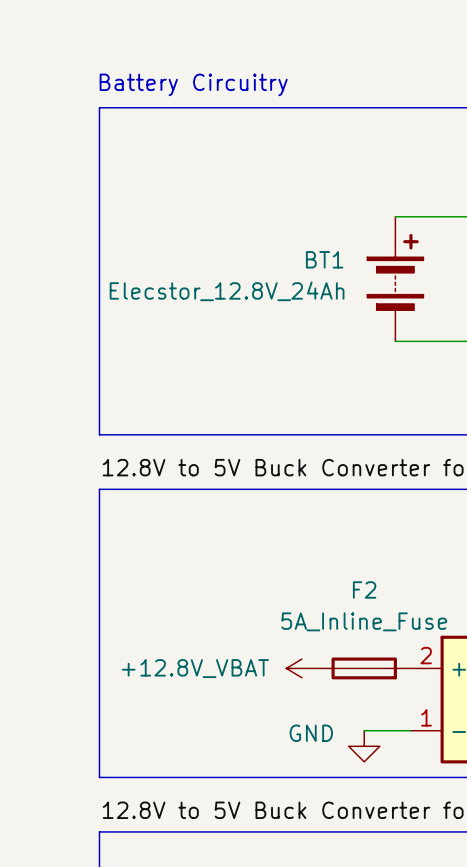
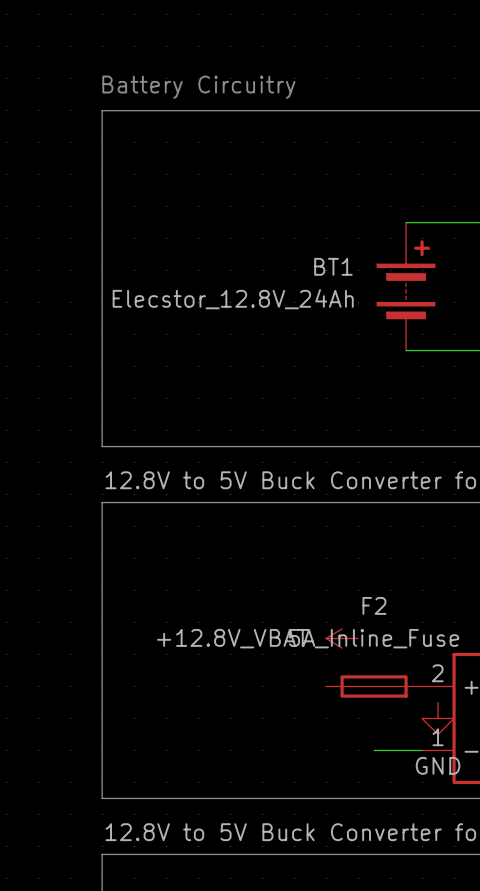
power symbol position: +12.8V_VBAT (301, 668) -> +12.8V_VBAT (342, 638)
power symbol text position: GND (311, 733) -> GND (438, 765)
power symbol position: GND (364, 746) -> GND (438, 718)

